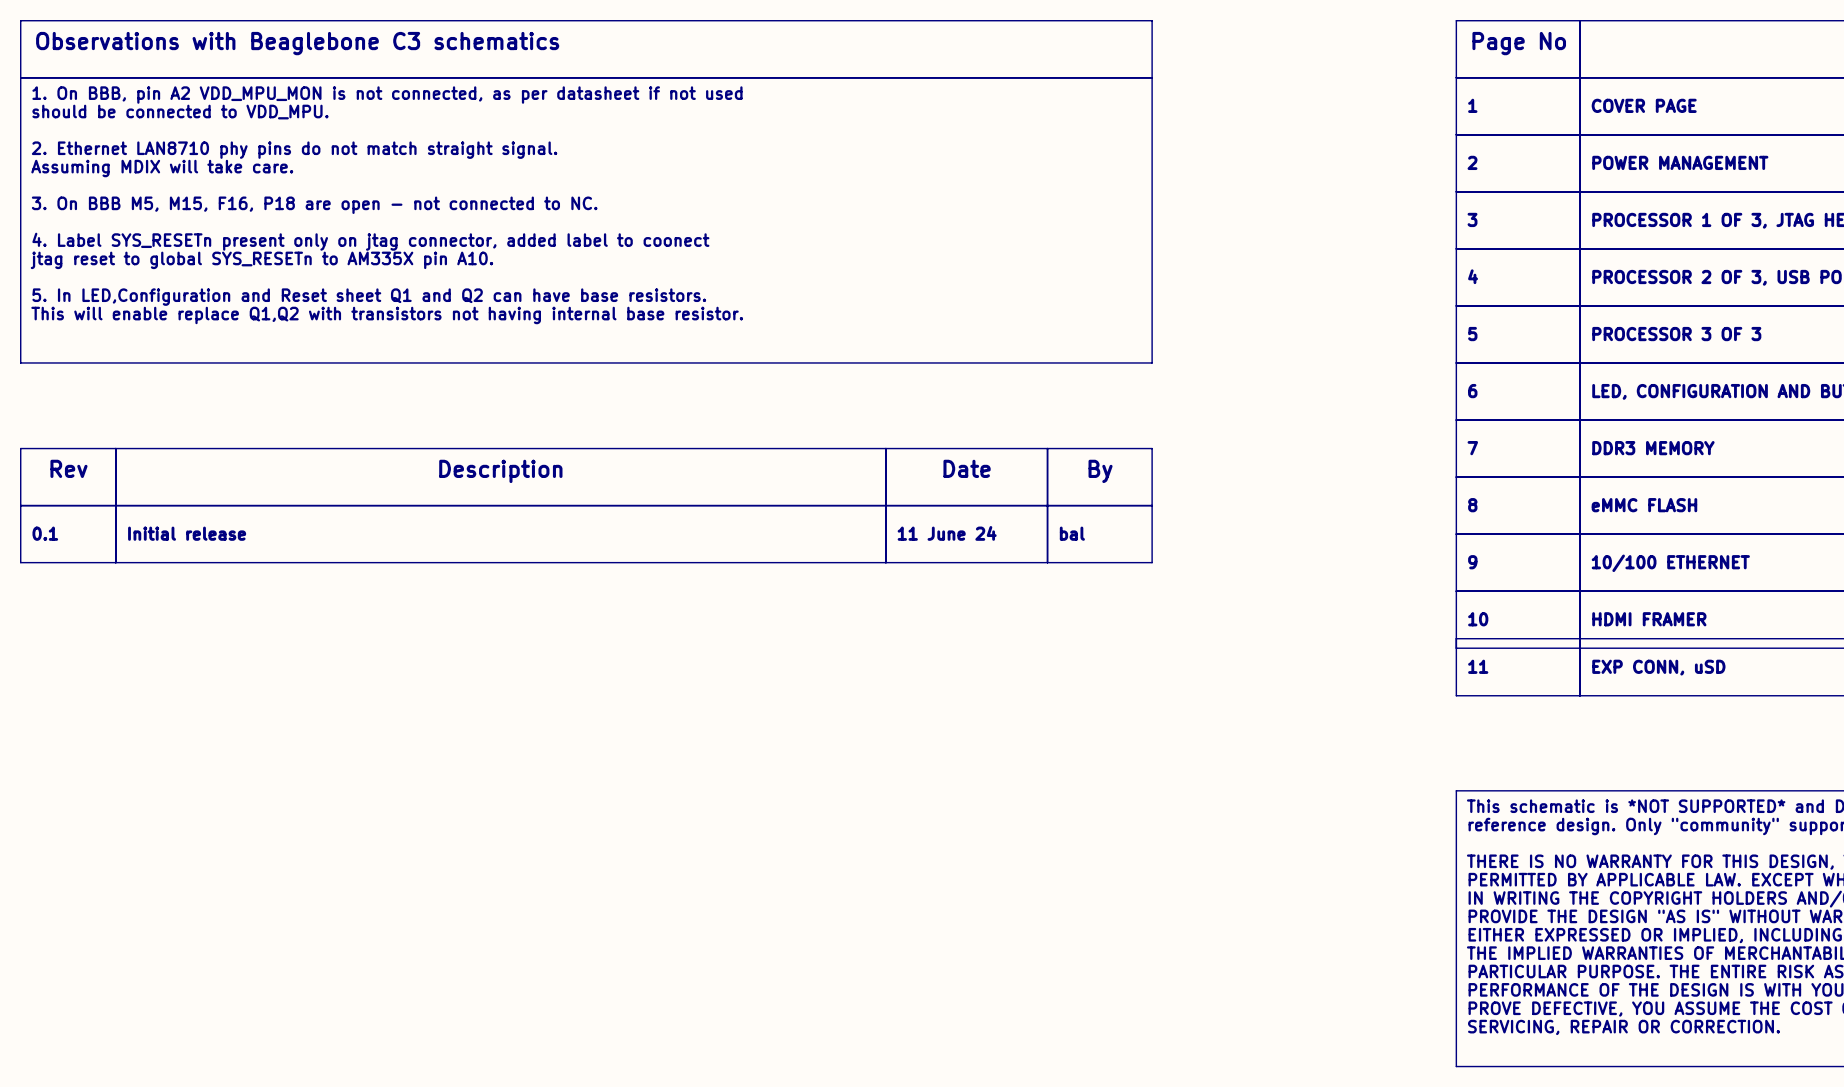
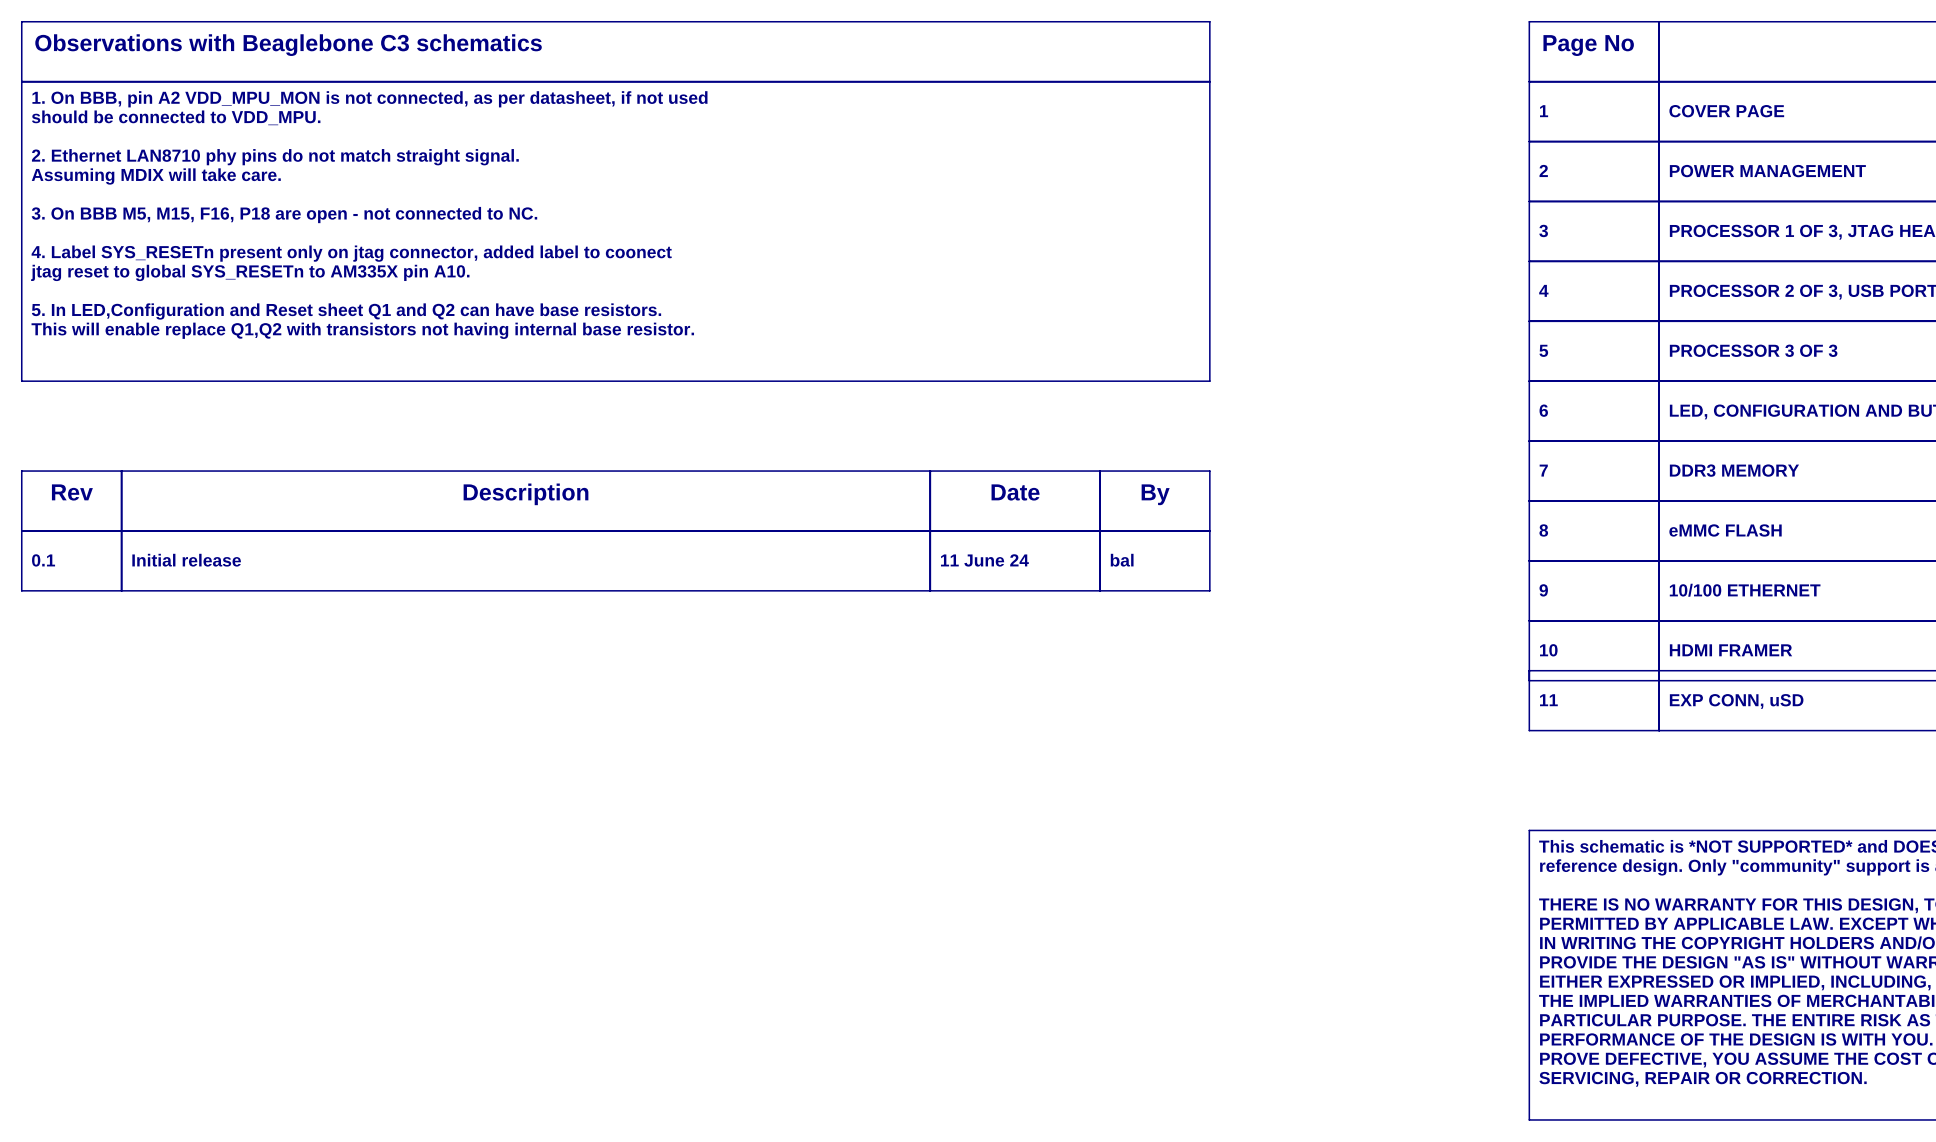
text: 1. On BBB, pin A2 VDD_MPU_MON is not connected, as per datasheet if not used (387, 95) -> 1. On BBB, pin A2 VDD_MPU_MON is not connected, as per datasheet, if not used (369, 99)

